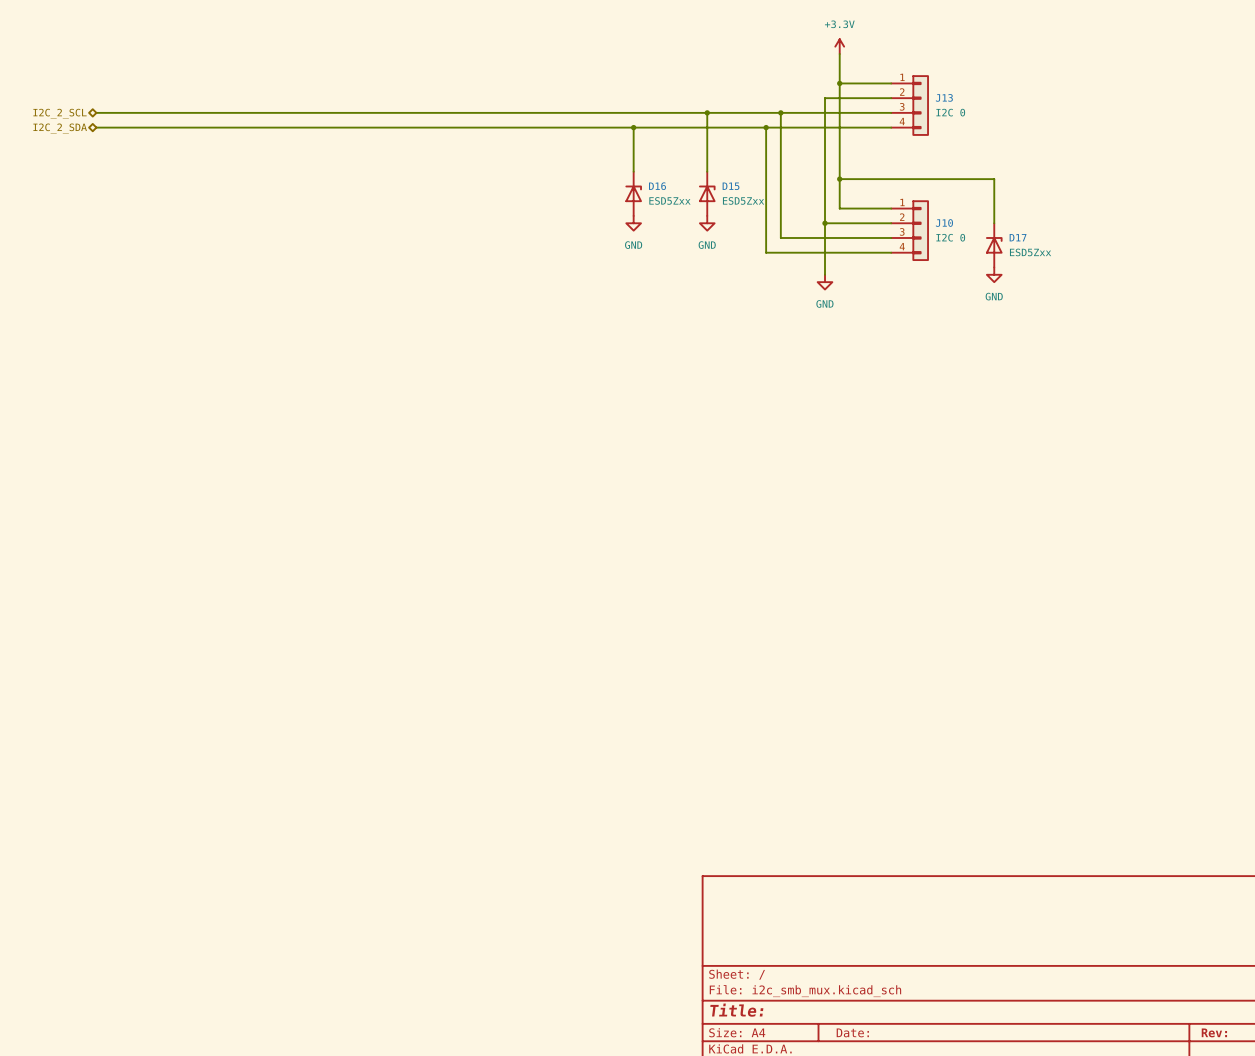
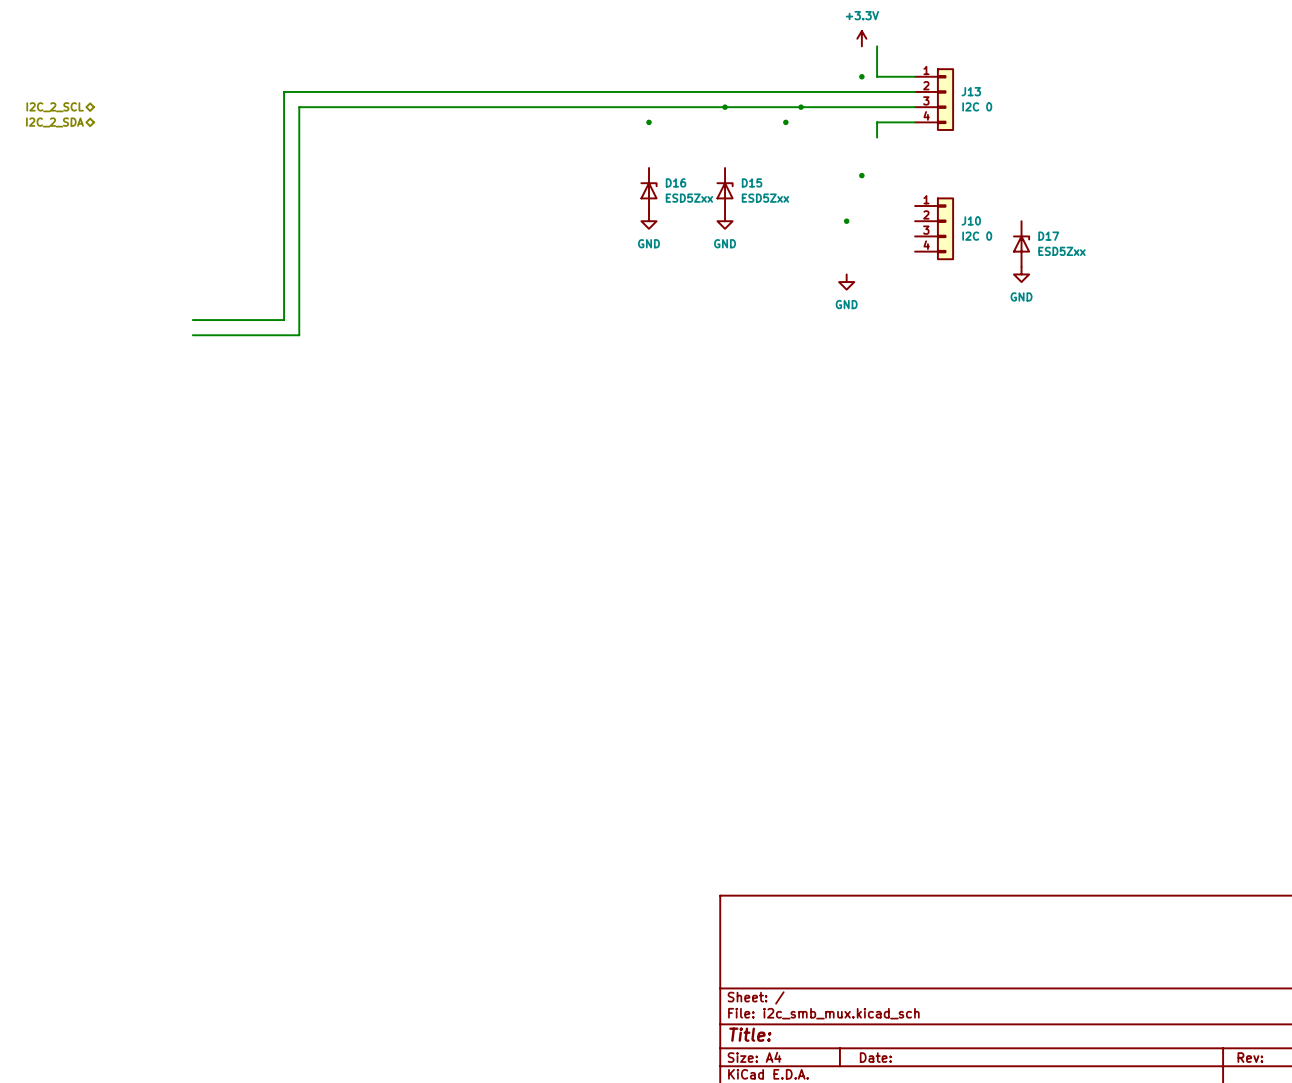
wire: (839, 54) (839, 208) (891, 208) -> none
wire: (839, 83) (854, 83) -> (877, 46) (877, 76)
wire: (825, 98) (825, 274) -> (846, 91) (284, 91) (284, 320) (192, 320)
wire: (96, 112) (295, 112) -> (192, 335) (299, 335) (299, 107)
wire: (707, 112) (707, 171) -> none
wire: (780, 112) (780, 237) (891, 237) -> none
wire: (96, 127) (854, 127) -> (877, 137) (877, 122)
wire: (633, 127) (633, 171) -> none
wire: (766, 127) (766, 252) (891, 252) -> none
wire: (839, 179) (994, 179) (994, 223) -> none
wire: (825, 223) (891, 223) -> none

